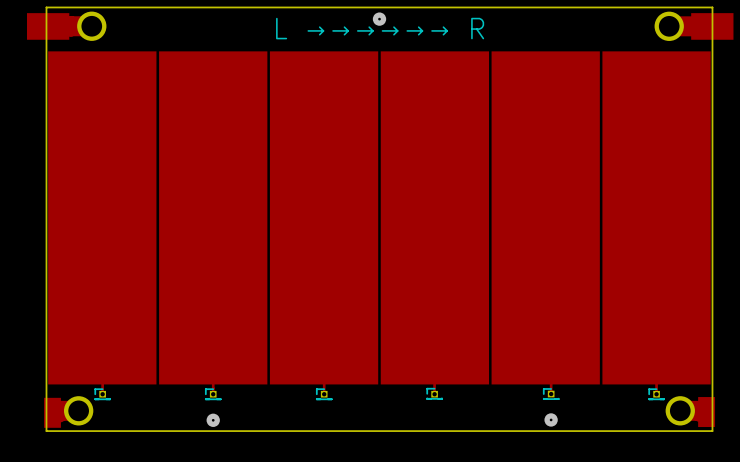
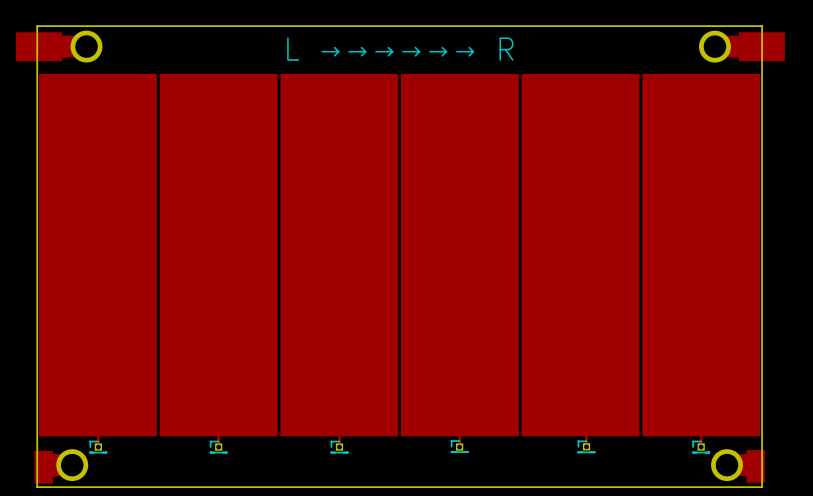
via: (379, 19) -> none
via: (551, 419) -> none
via: (213, 420) -> none

